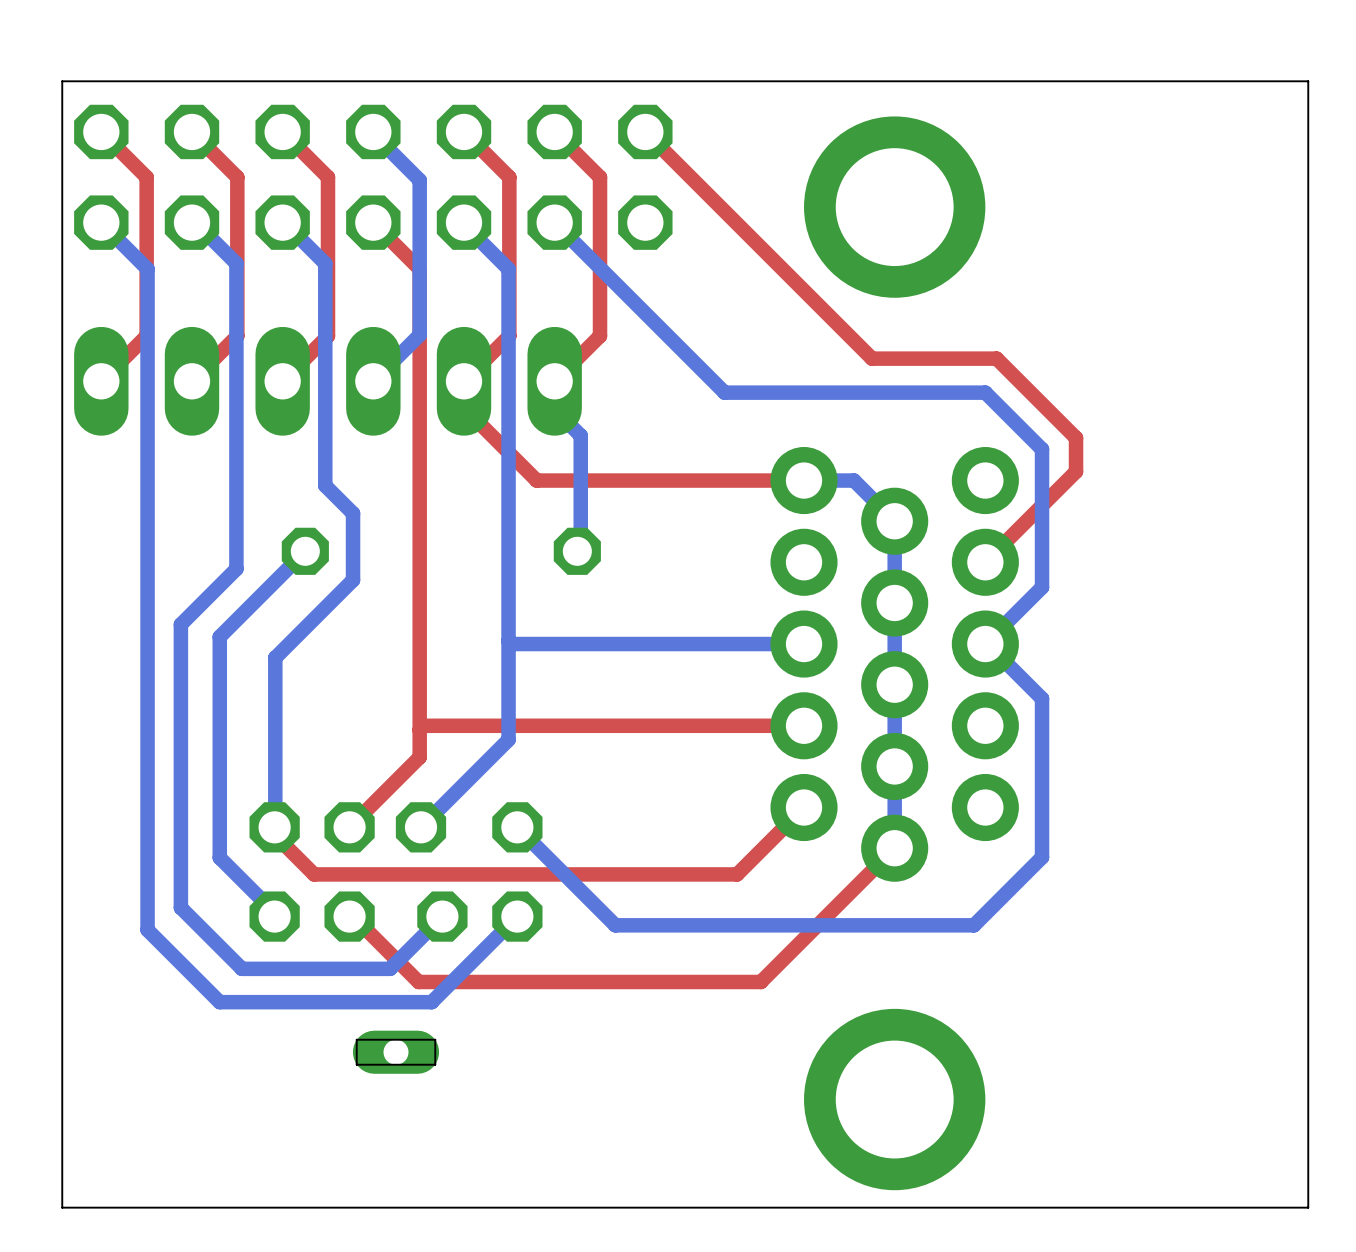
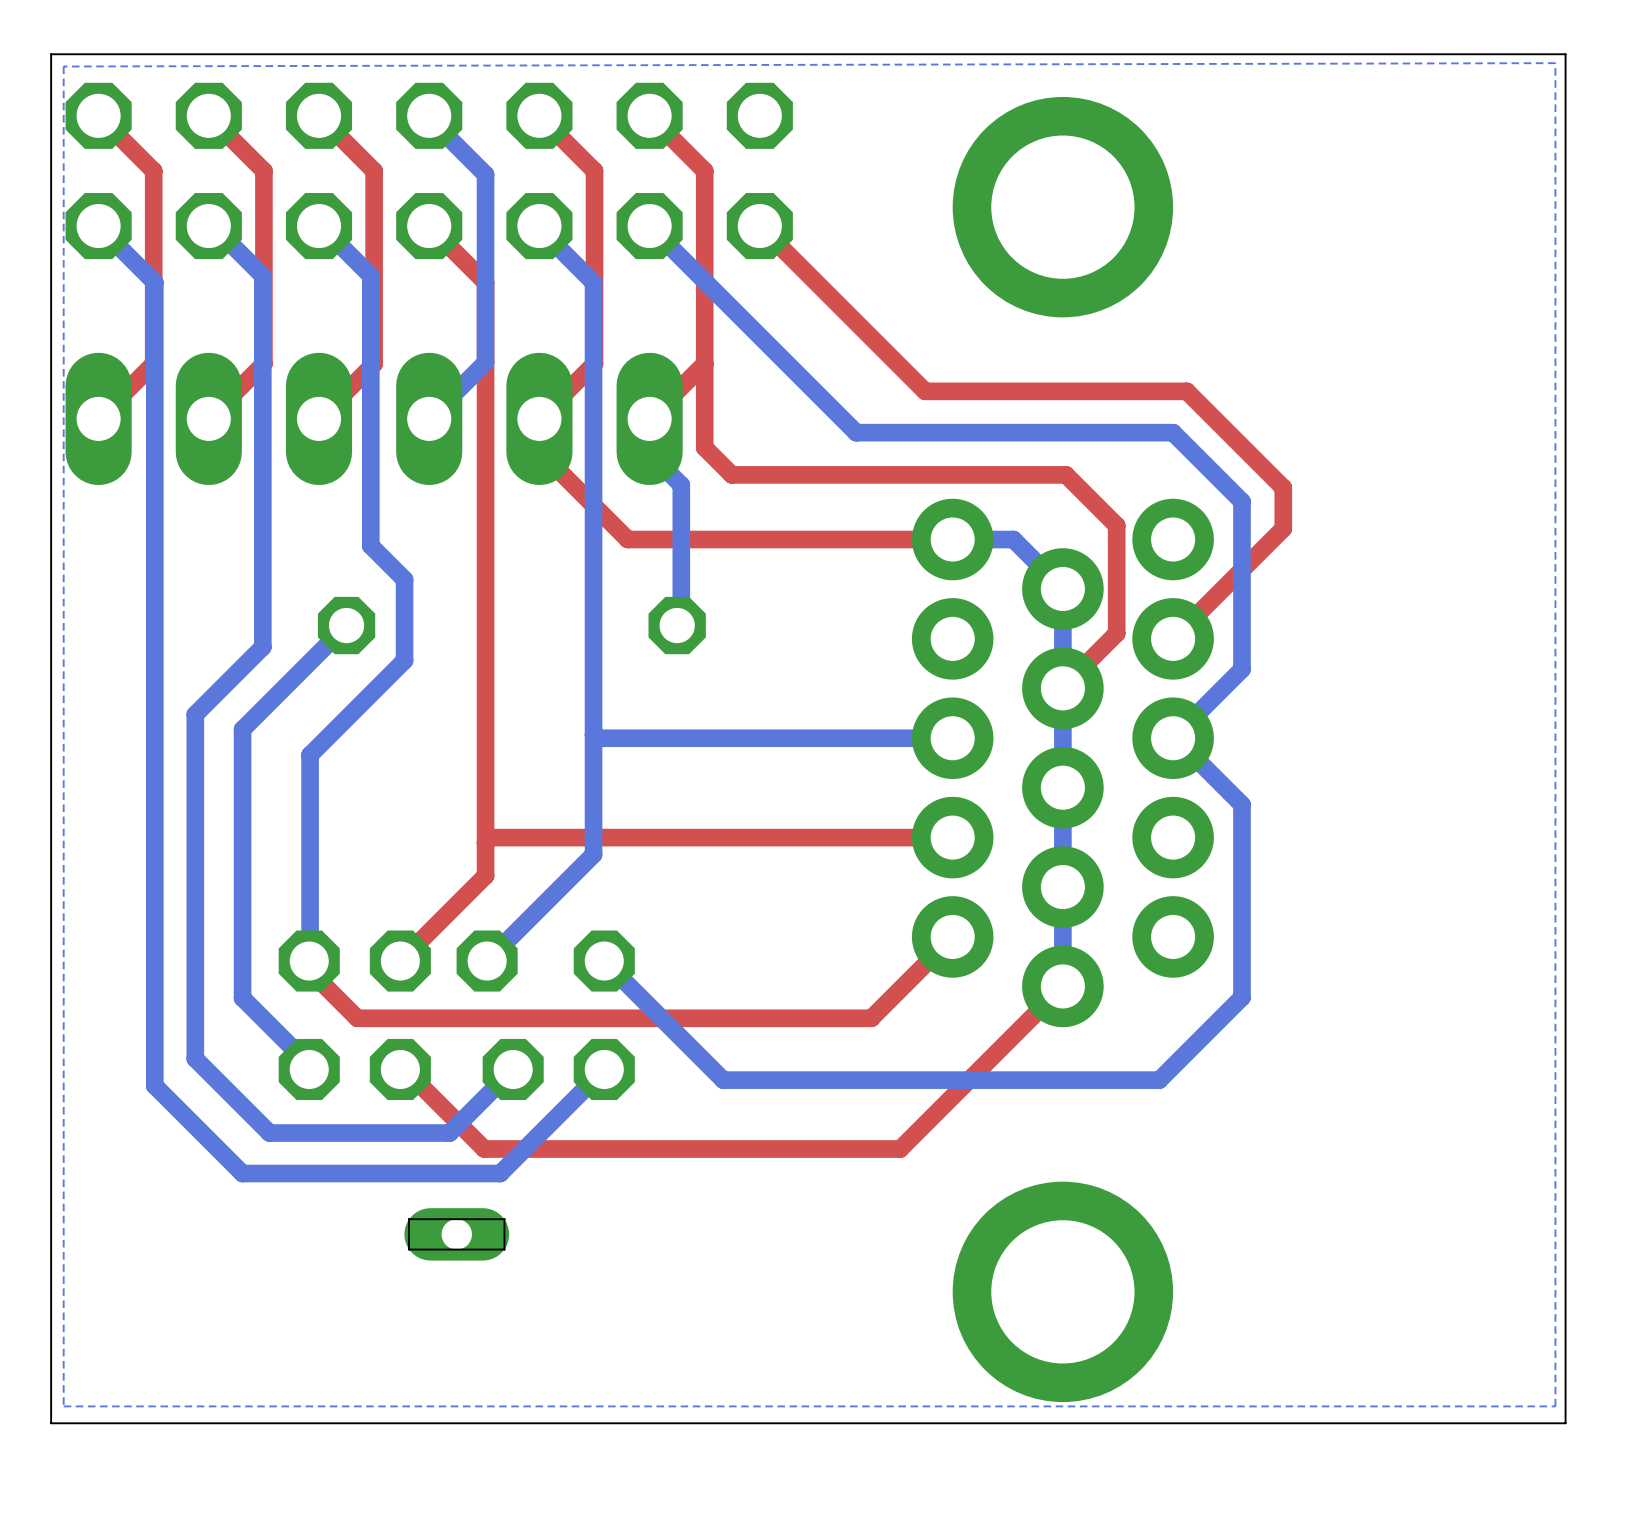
bottom zone outline: none -> (1555, 63) (1555, 1406) (63, 1406) (63, 66) (1555, 63)
top track: (645, 131) (872, 358) -> (759, 226) (925, 391) (1035, 391)
top track: none -> (704, 363) (704, 447) (731, 474) (1066, 474) (1116, 525) (1116, 633) (1062, 688)

